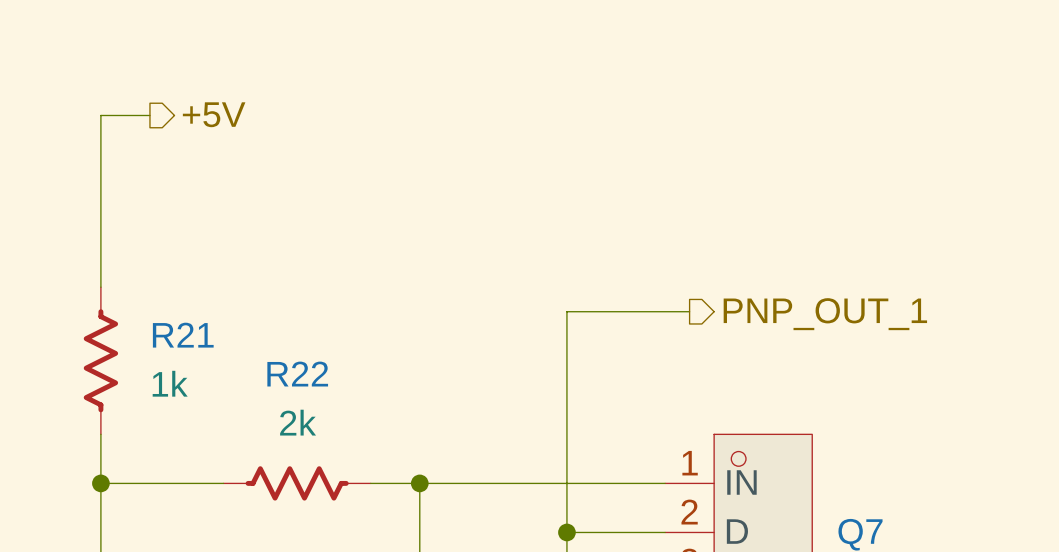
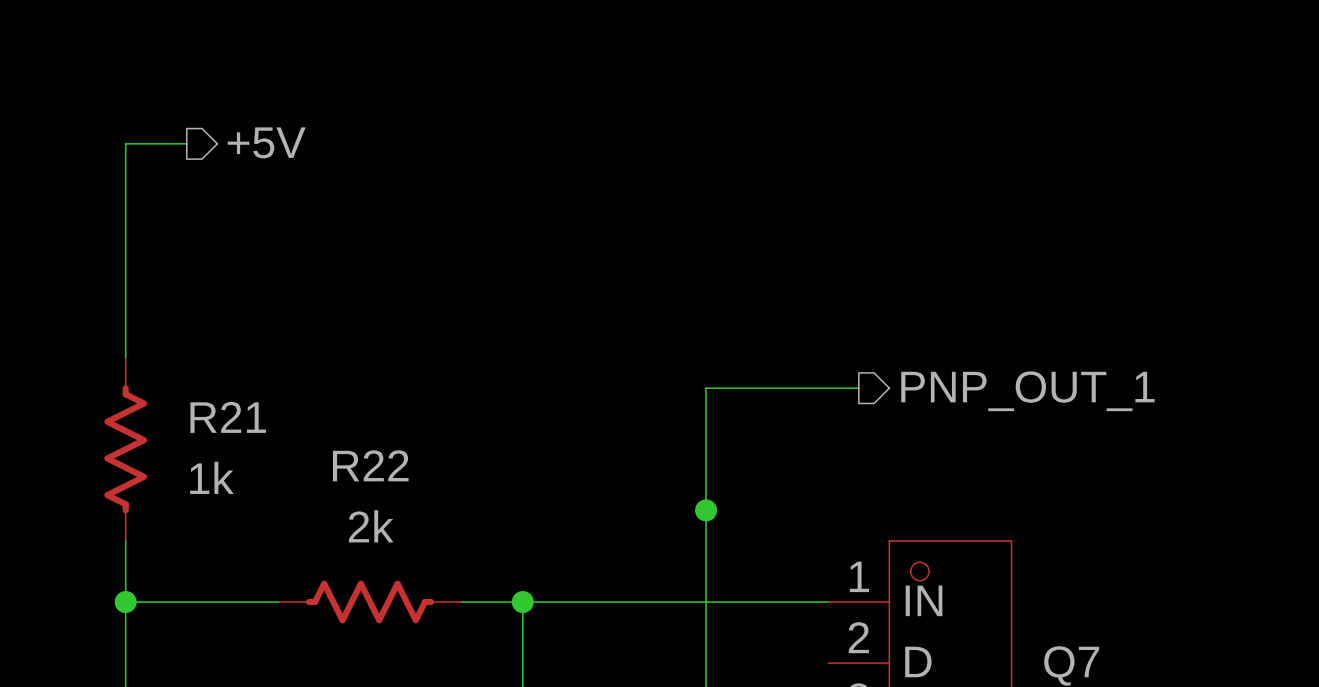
junction: none -> (706, 510)
wire: (566, 532) (665, 532) -> none
junction: (566, 532) -> none

